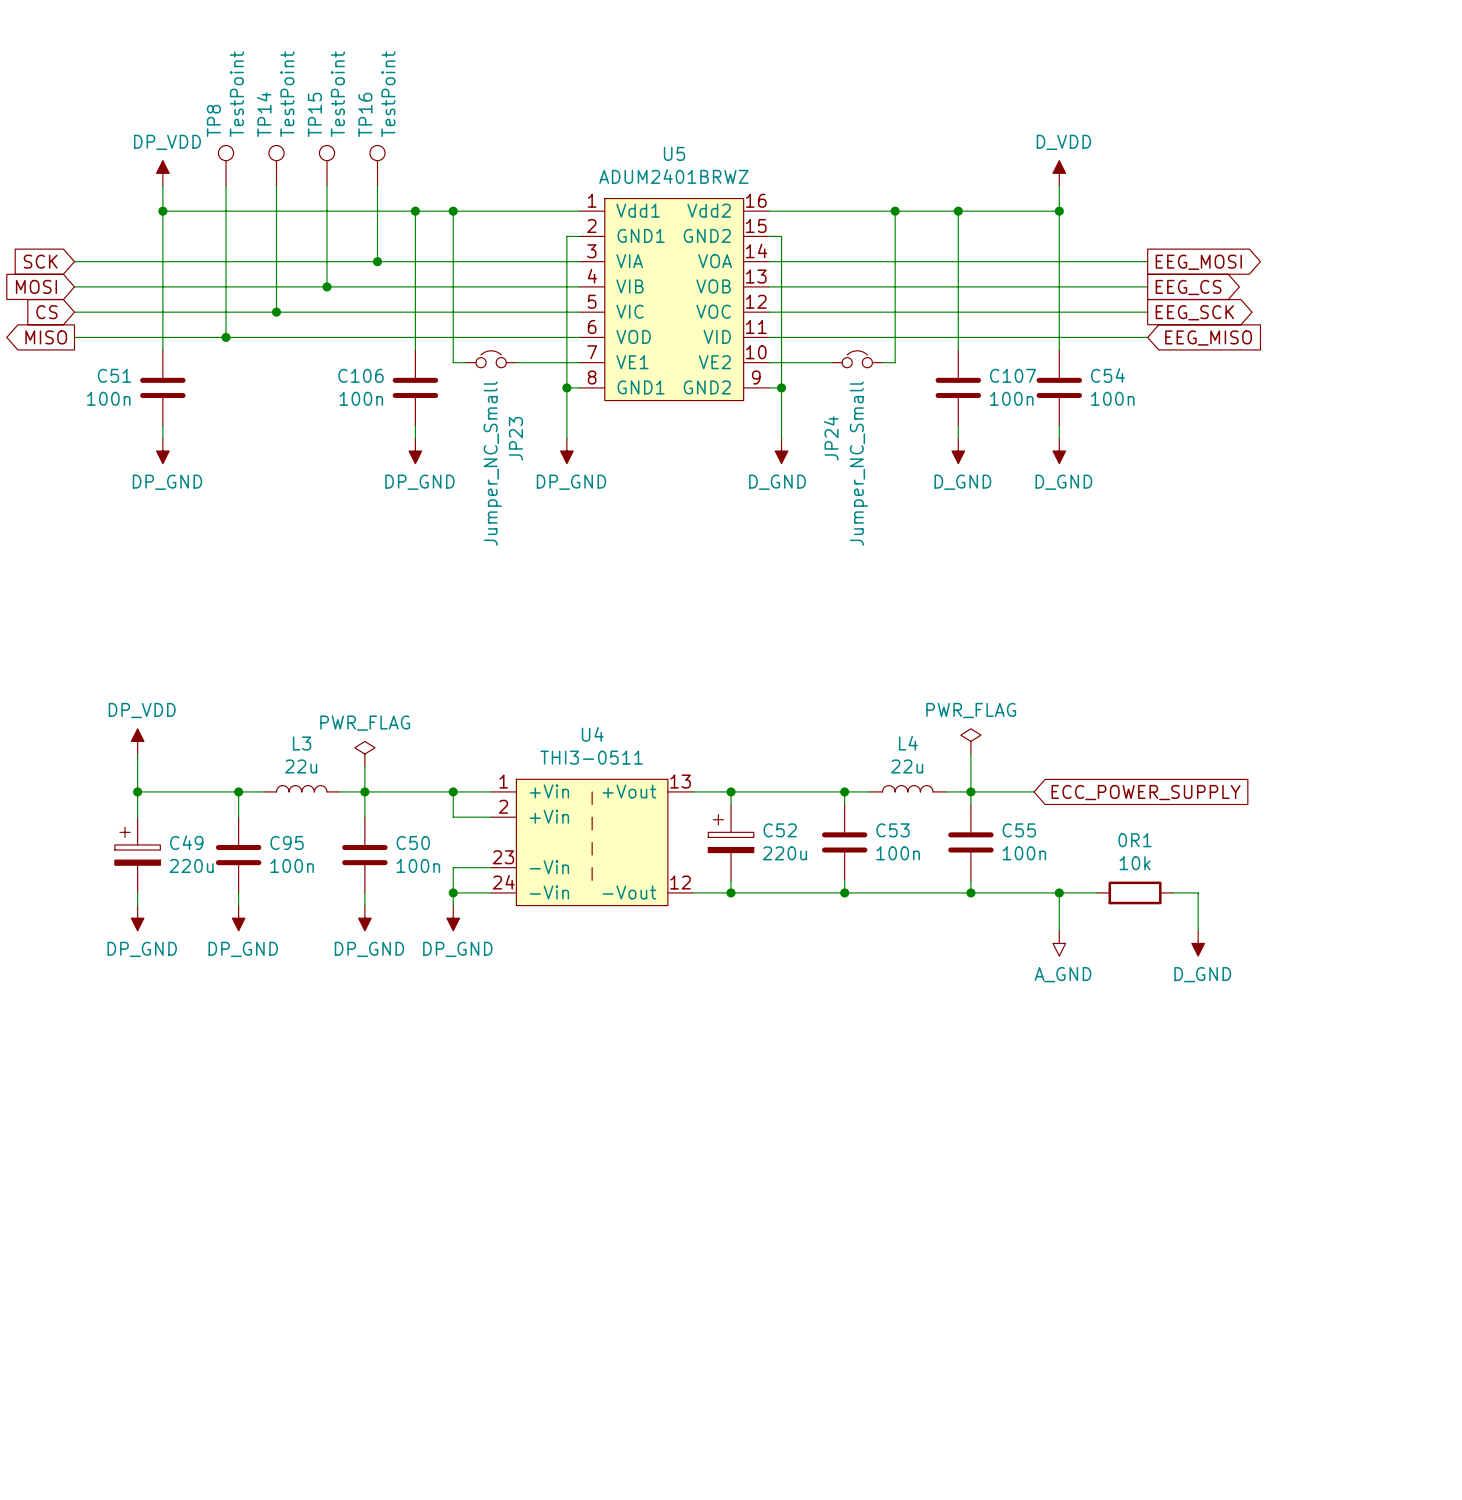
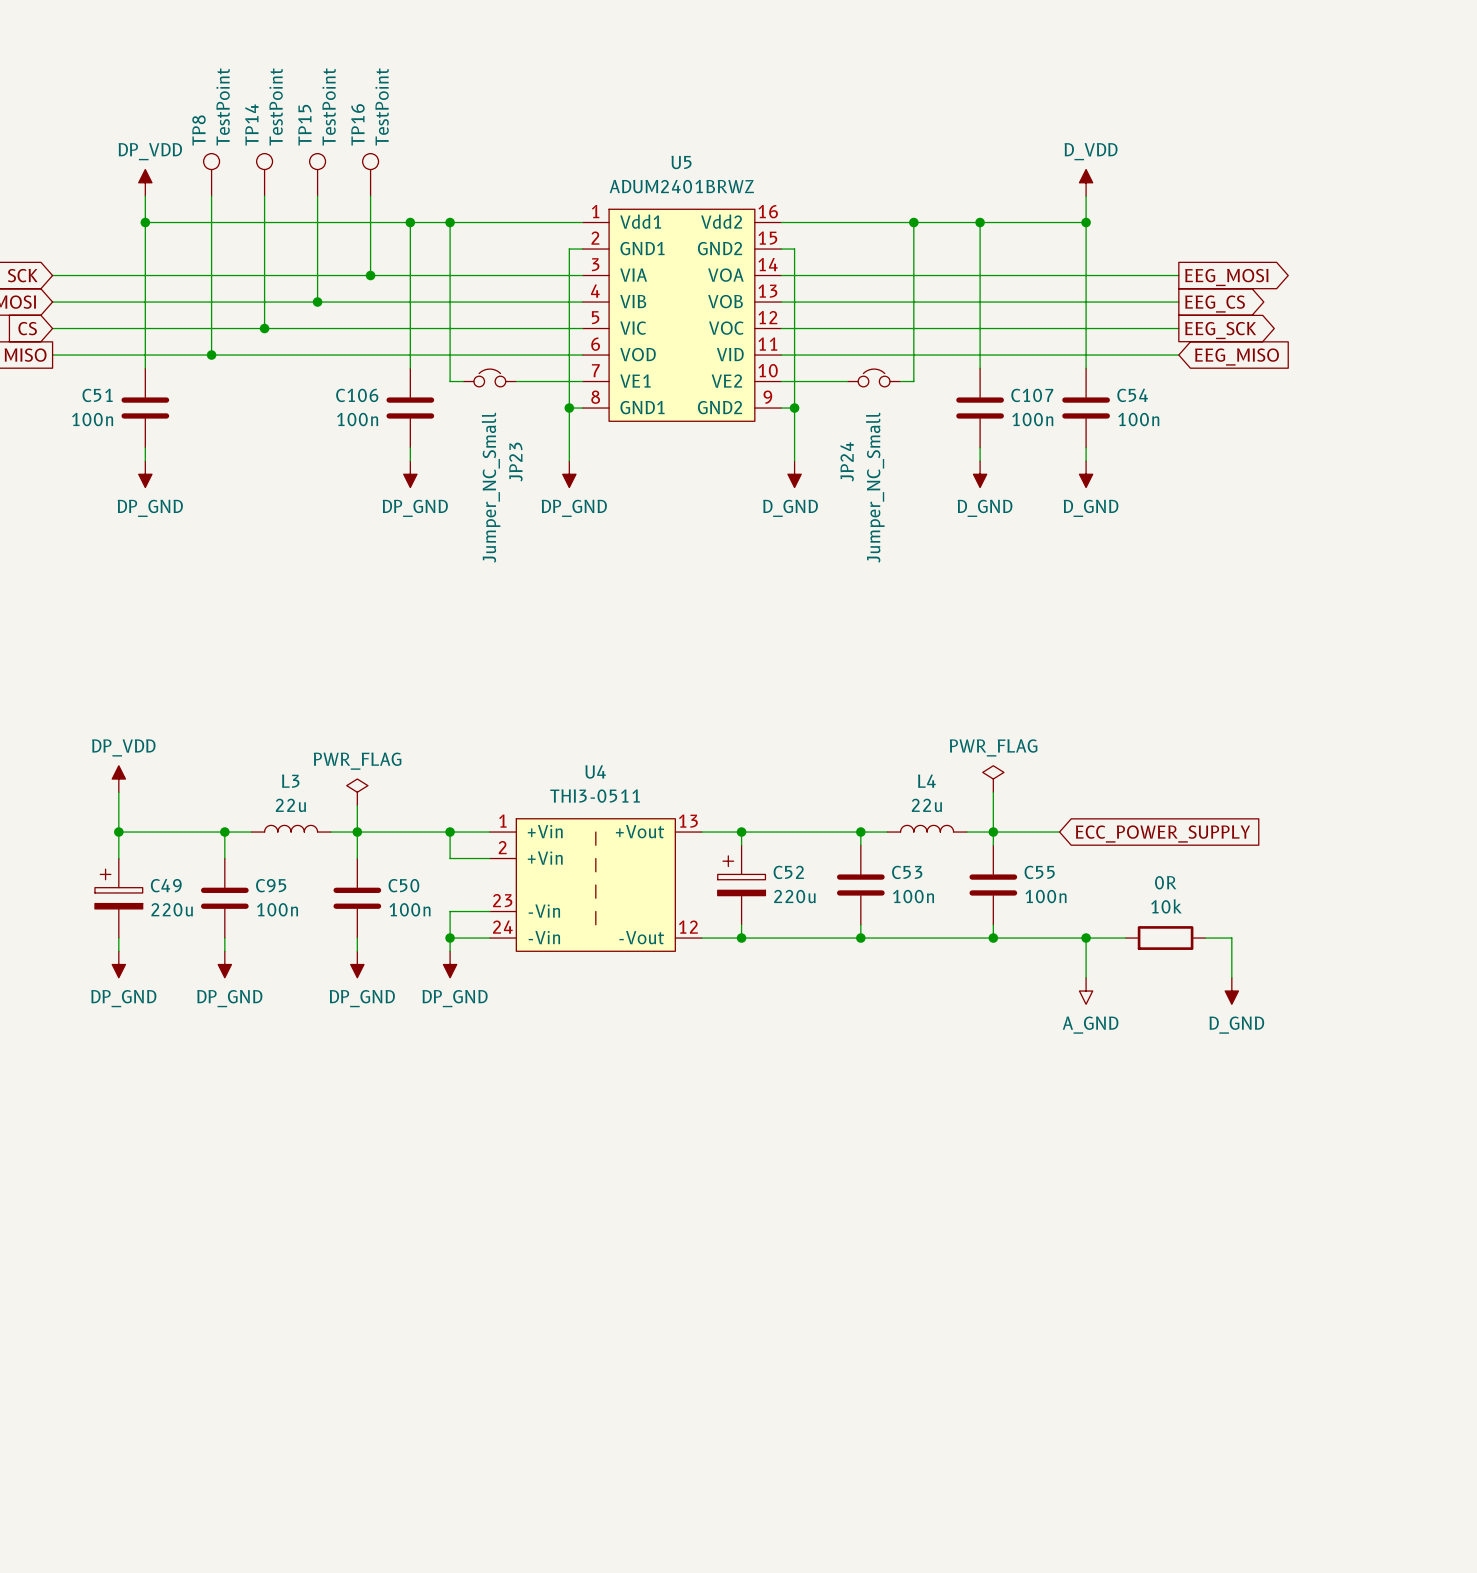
0R1 name: 0R1 (1135, 840) -> 0R (1165, 882)

